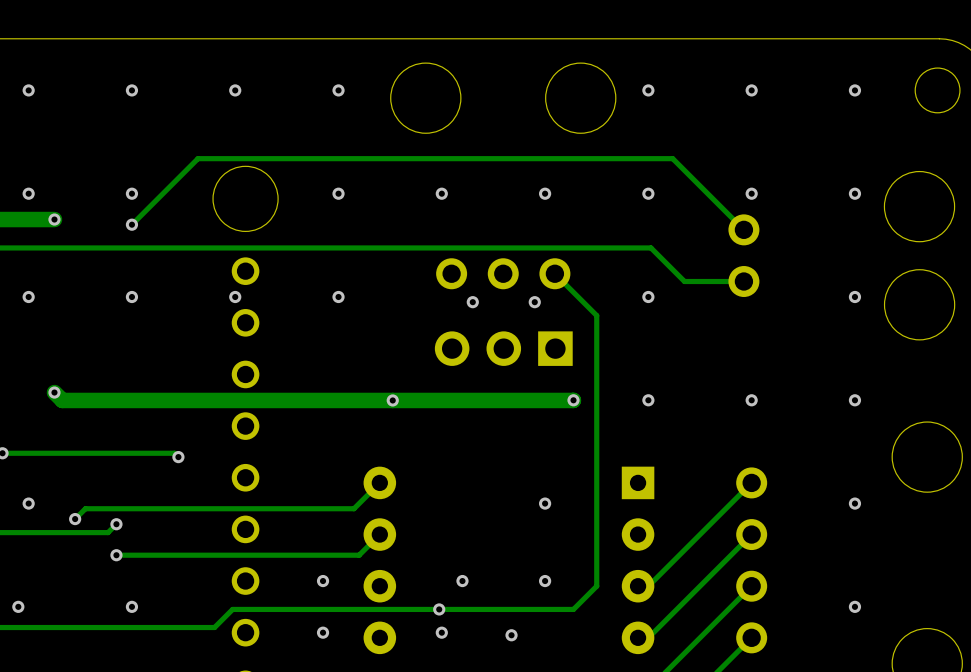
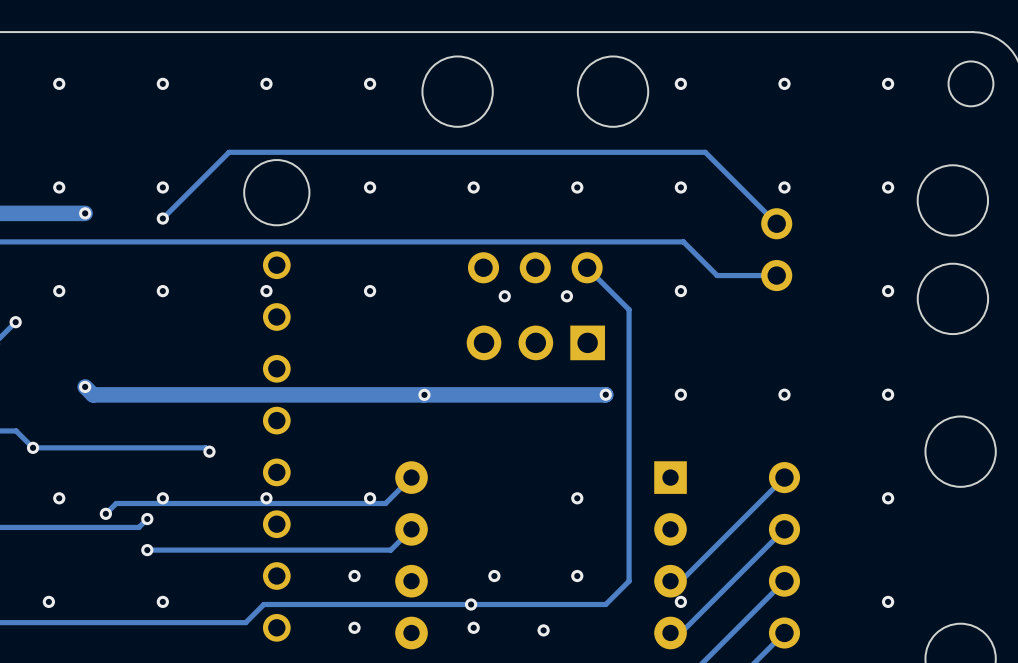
via: none -> (162, 498)
via: none -> (266, 498)
via: none -> (370, 498)
via: none -> (680, 601)

